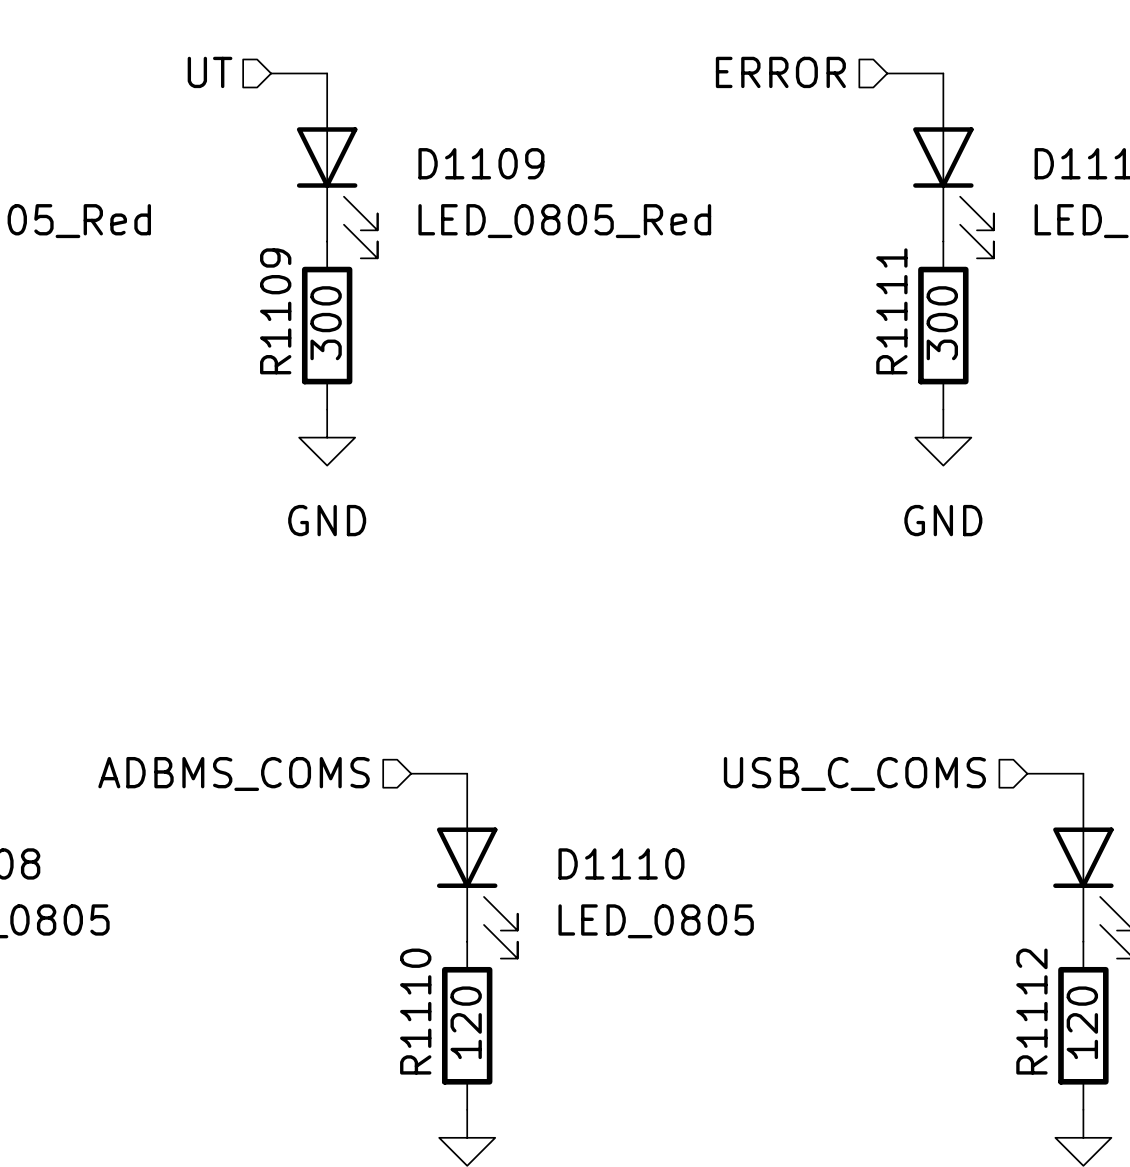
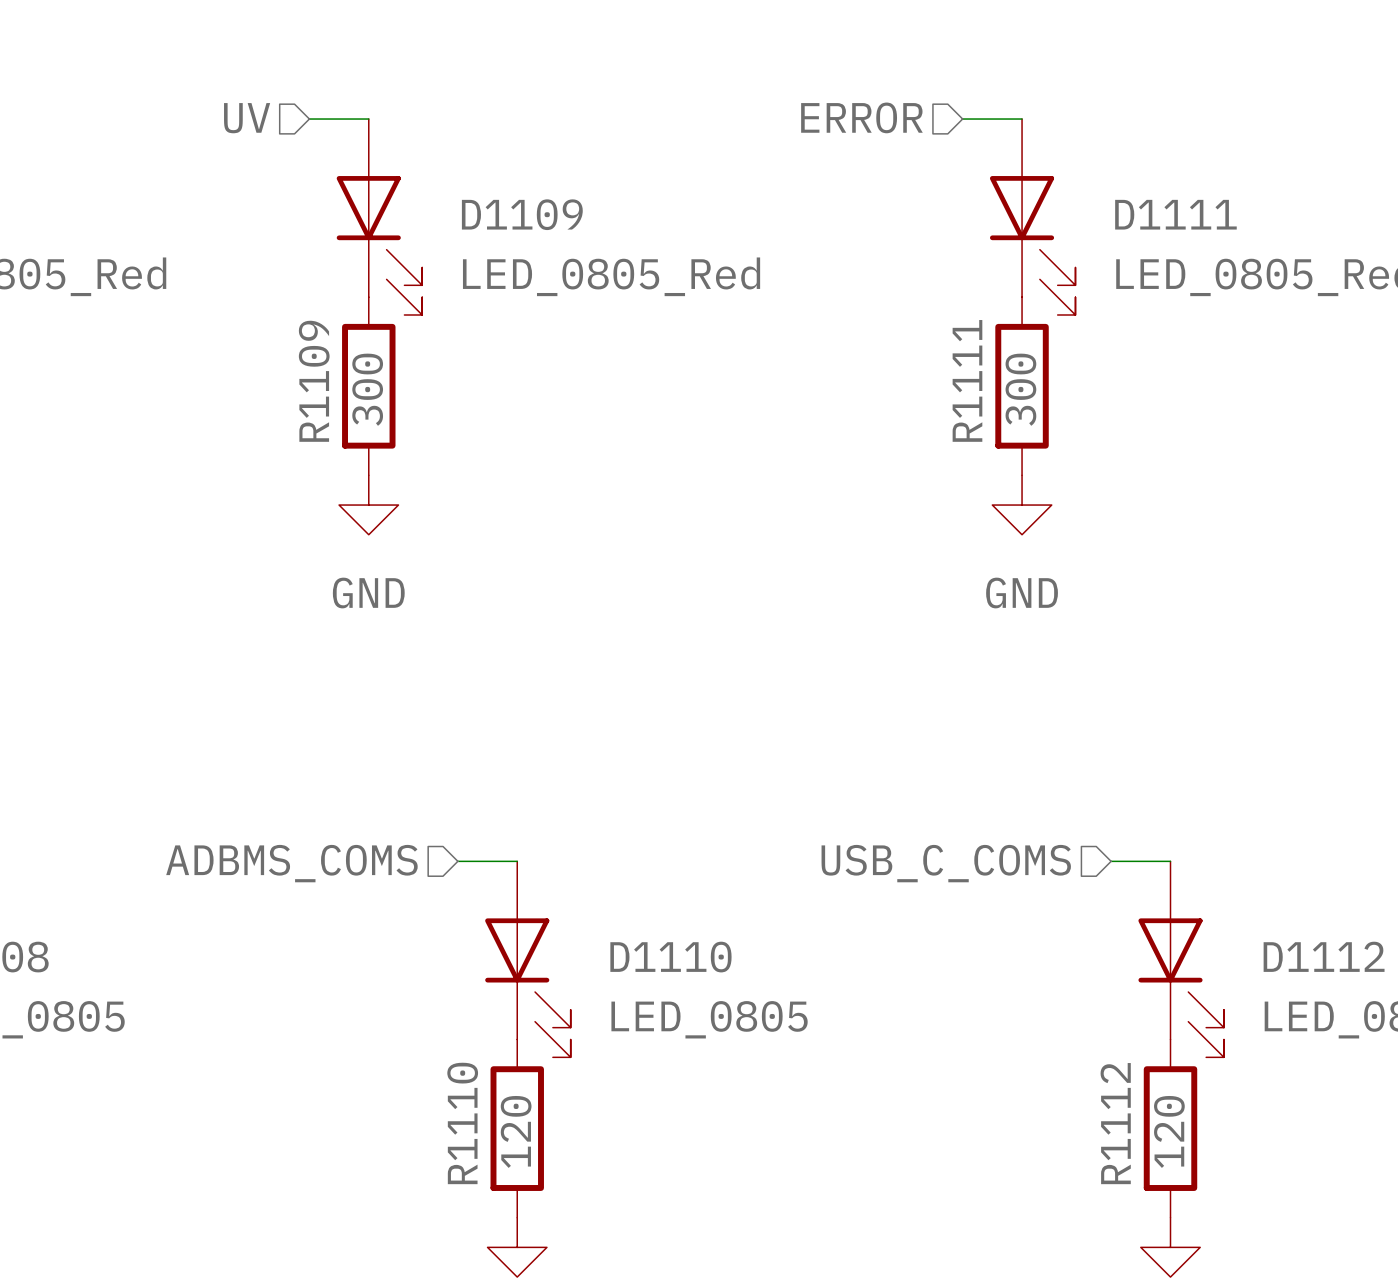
hierarchical label: UT (210, 72) -> UV (247, 118)

